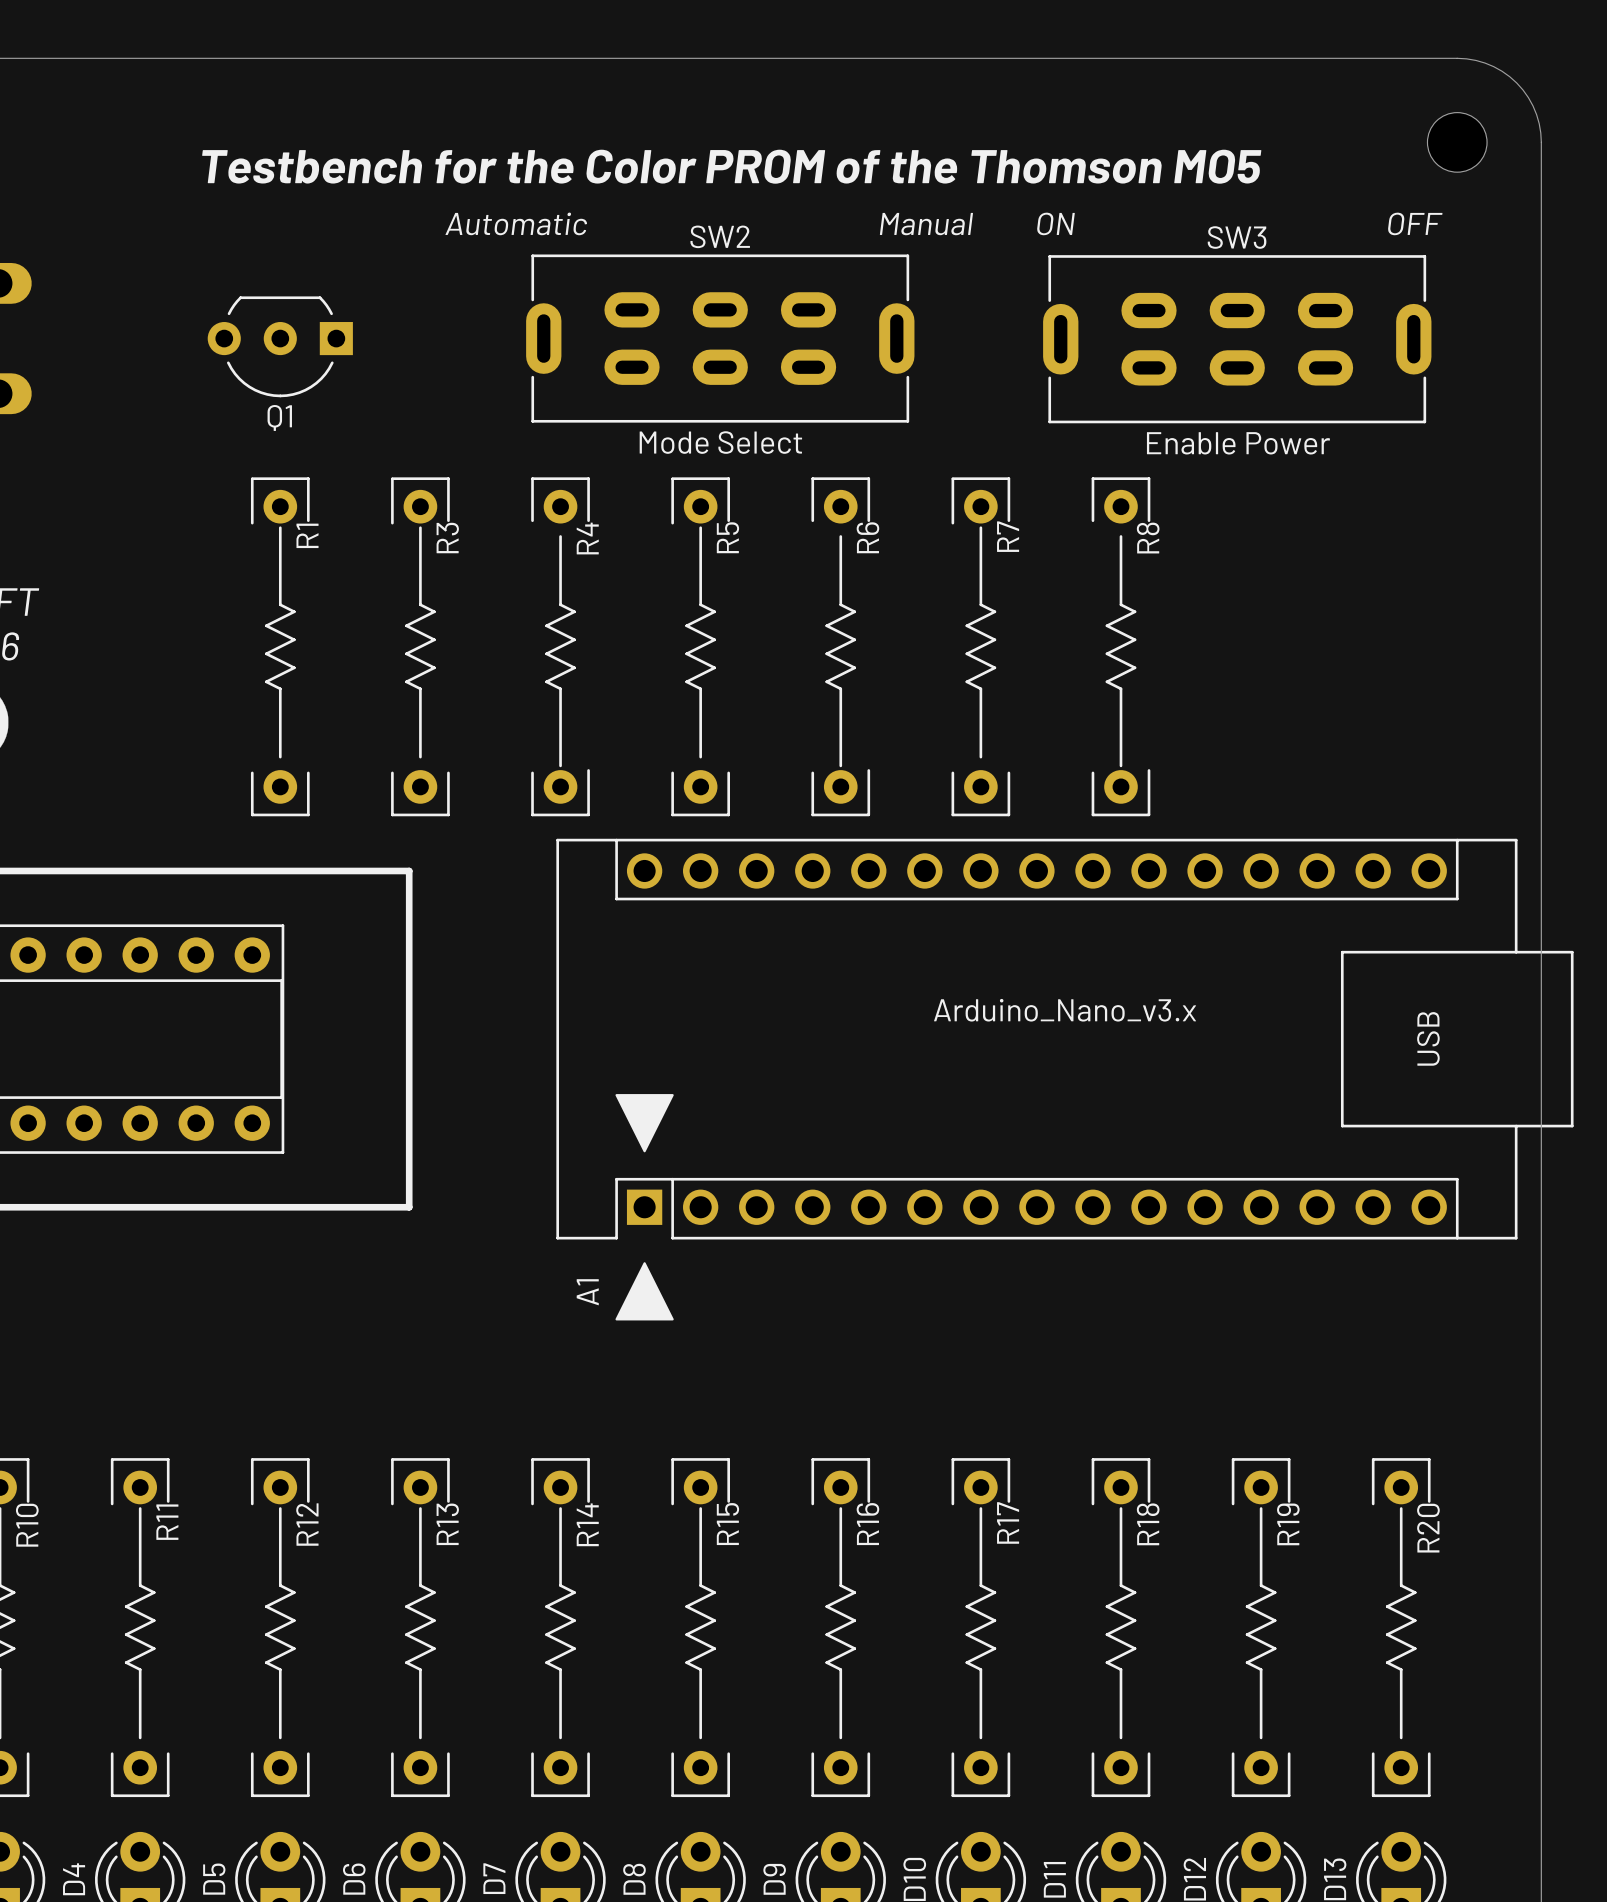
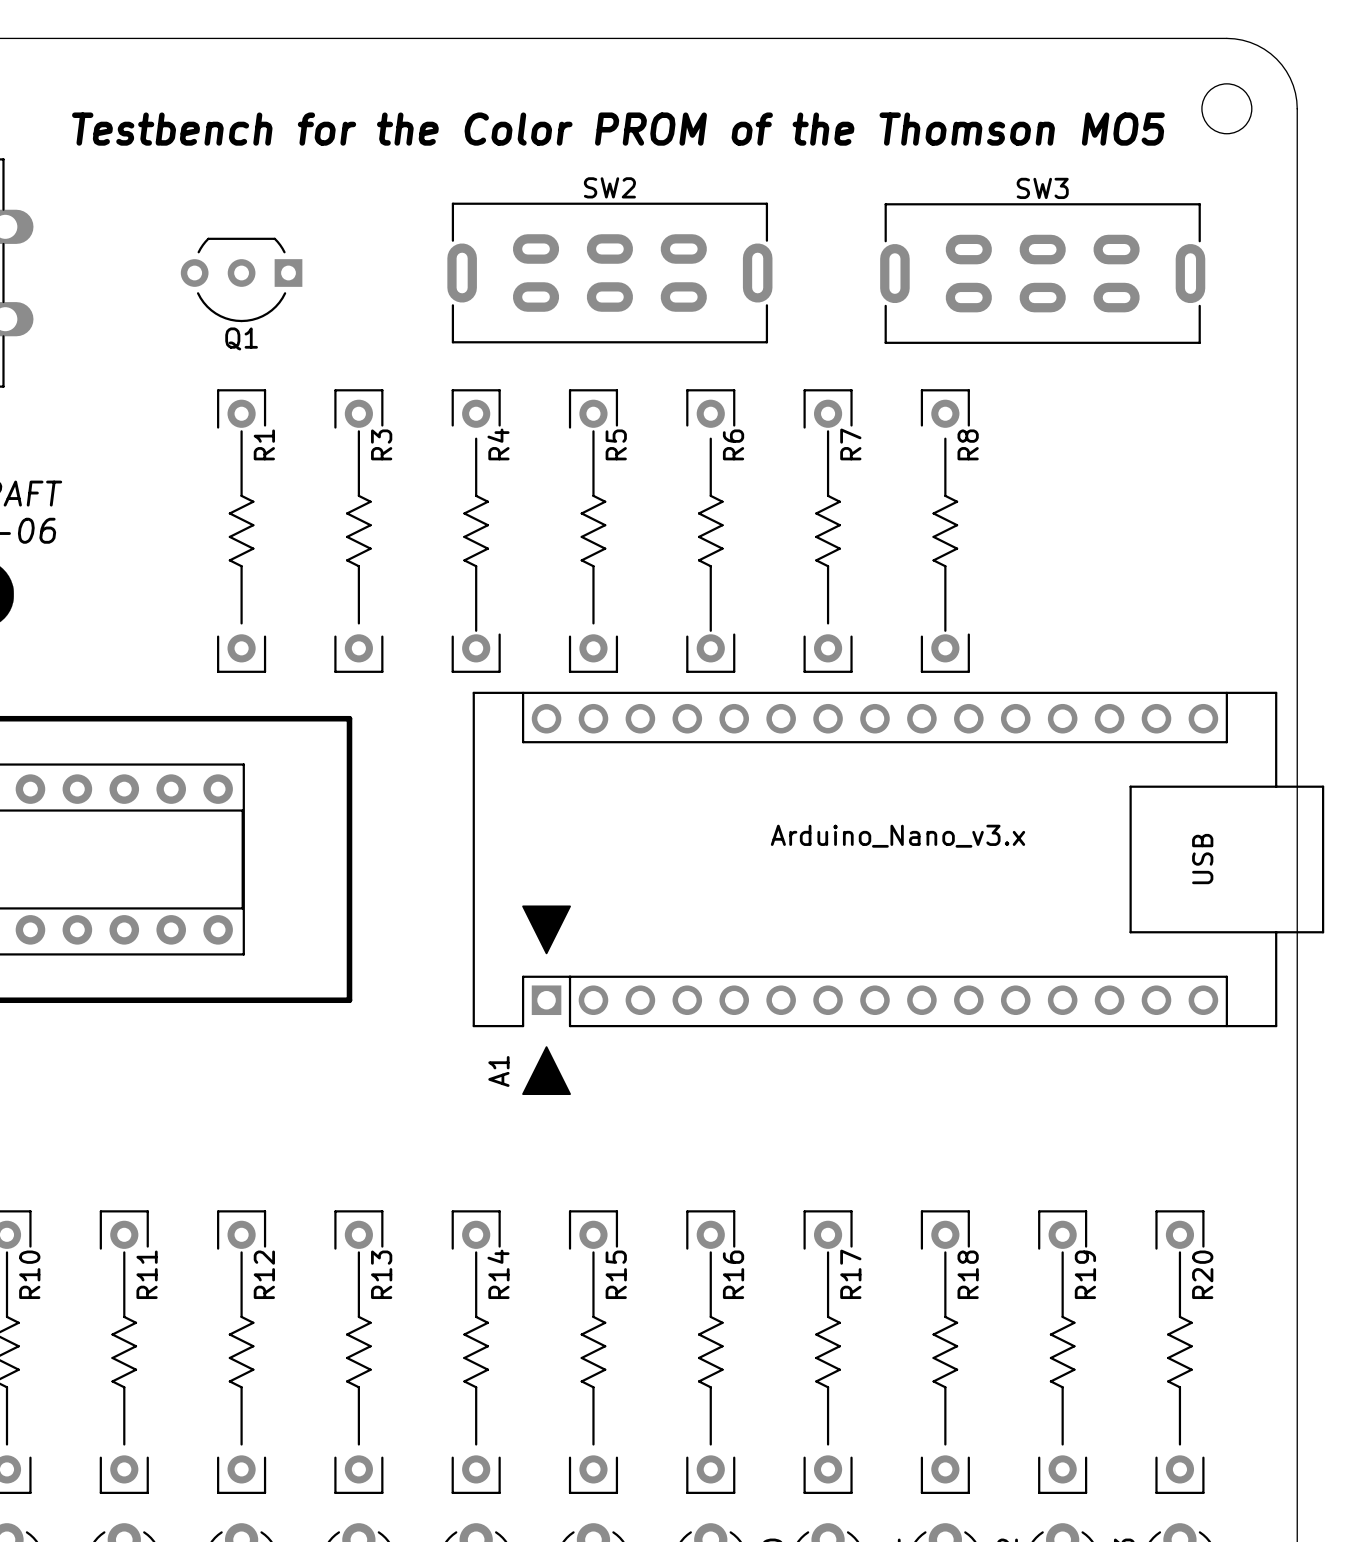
text: Automatic (516, 223) -> none
text: ON (1055, 223) -> none
text: OFF (1415, 223) -> none
text: Manual (926, 224) -> none
SW2 value: Mode Select (720, 442) -> none
SW3 value: Enable Power (1238, 443) -> none

